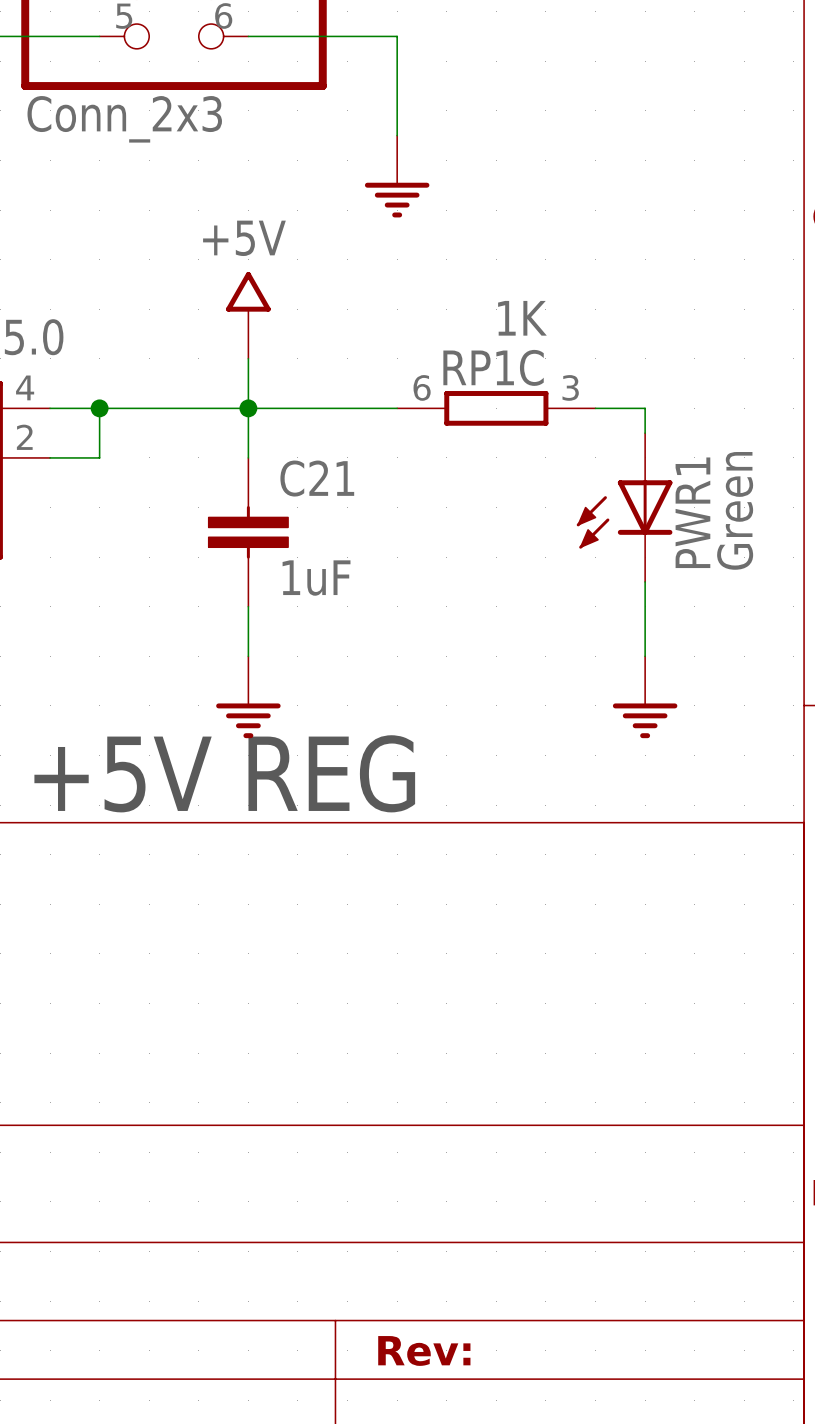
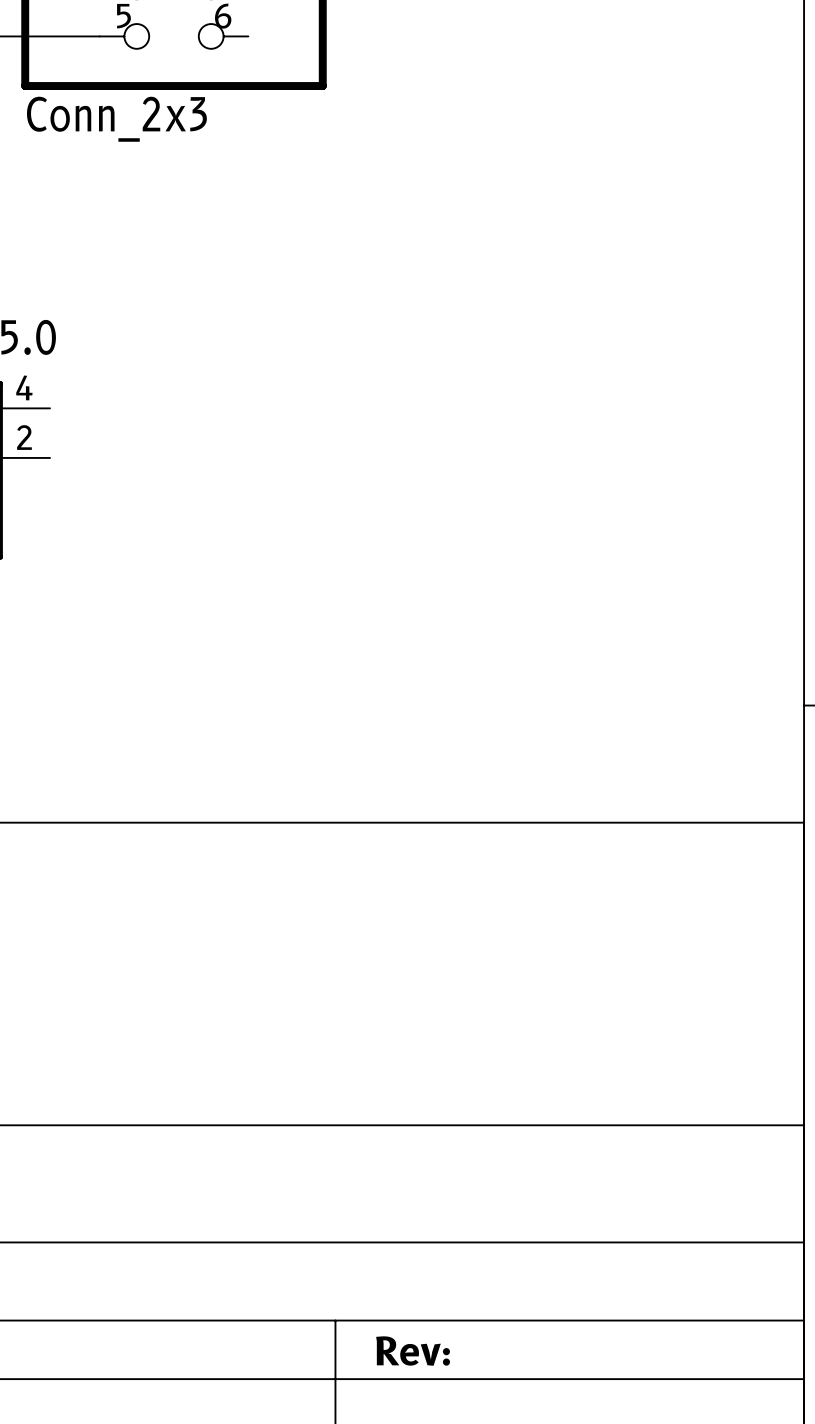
wire: (248, 36) (397, 36) (397, 135) -> none
power symbol: (397, 176) -> none
power symbol: +5V (248, 315) -> none
wire: (248, 358) (248, 457) -> none
wire: (50, 408) (397, 408) -> none
wire: (99, 408) (99, 457) (50, 457) -> none
junction: (99, 408) -> none
junction: (248, 408) -> none
RP1C: 1K (496, 408) -> none
wire: (595, 408) (645, 408) (645, 433) -> none
PWR1: Green (624, 507) -> none
C21: 1uF (248, 532) -> none
wire: (645, 581) (645, 656) -> none
wire: (248, 606) (248, 656) -> none
power symbol: (248, 697) -> none
power symbol: (645, 697) -> none
text: +5V REG (224, 773) -> none

